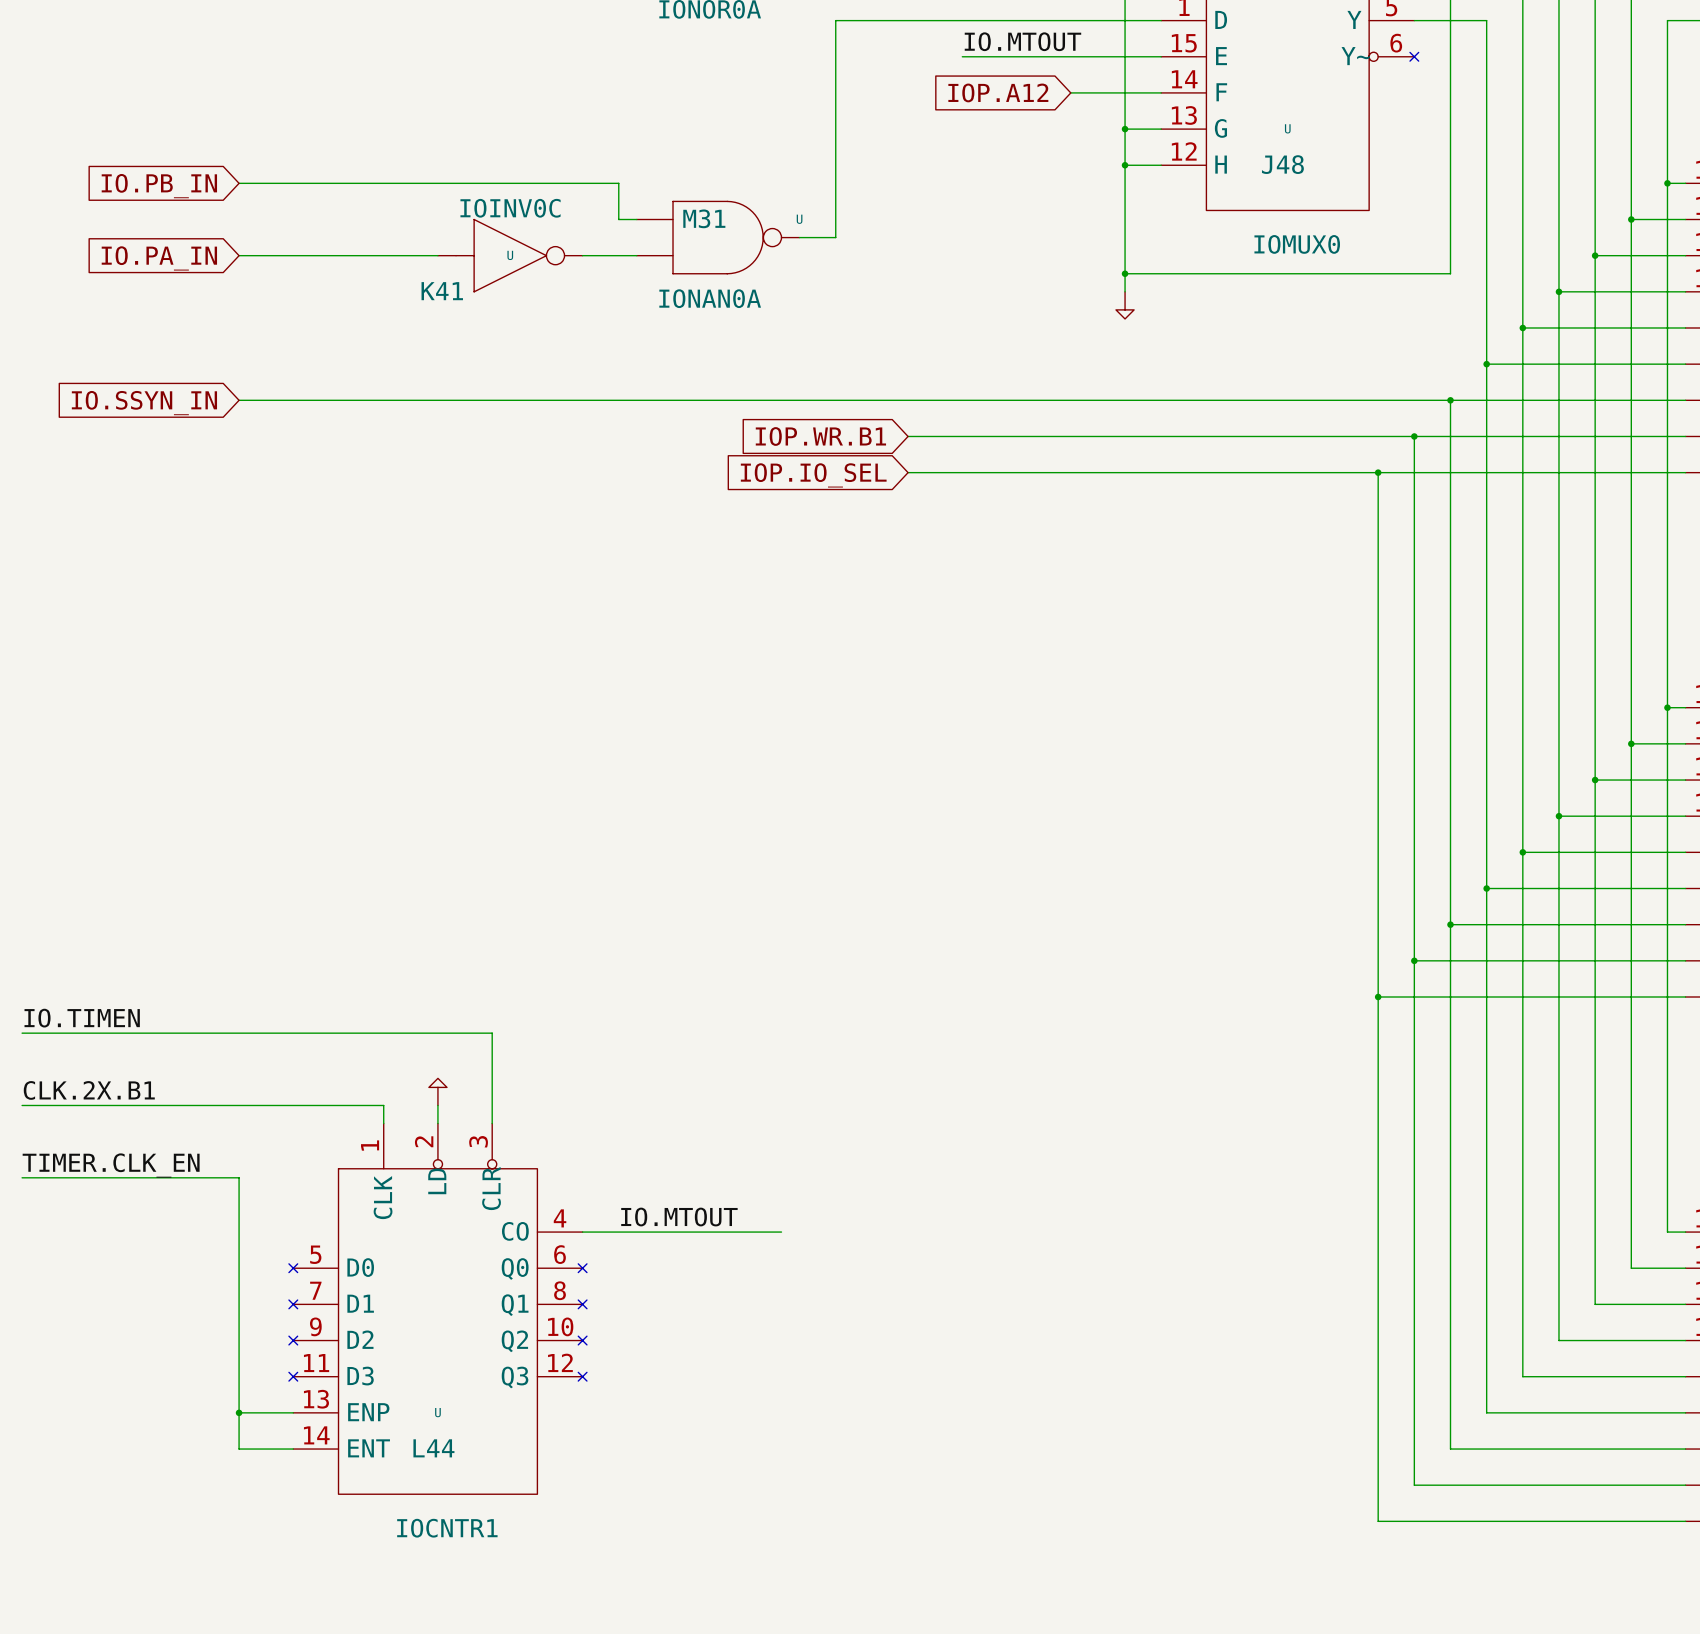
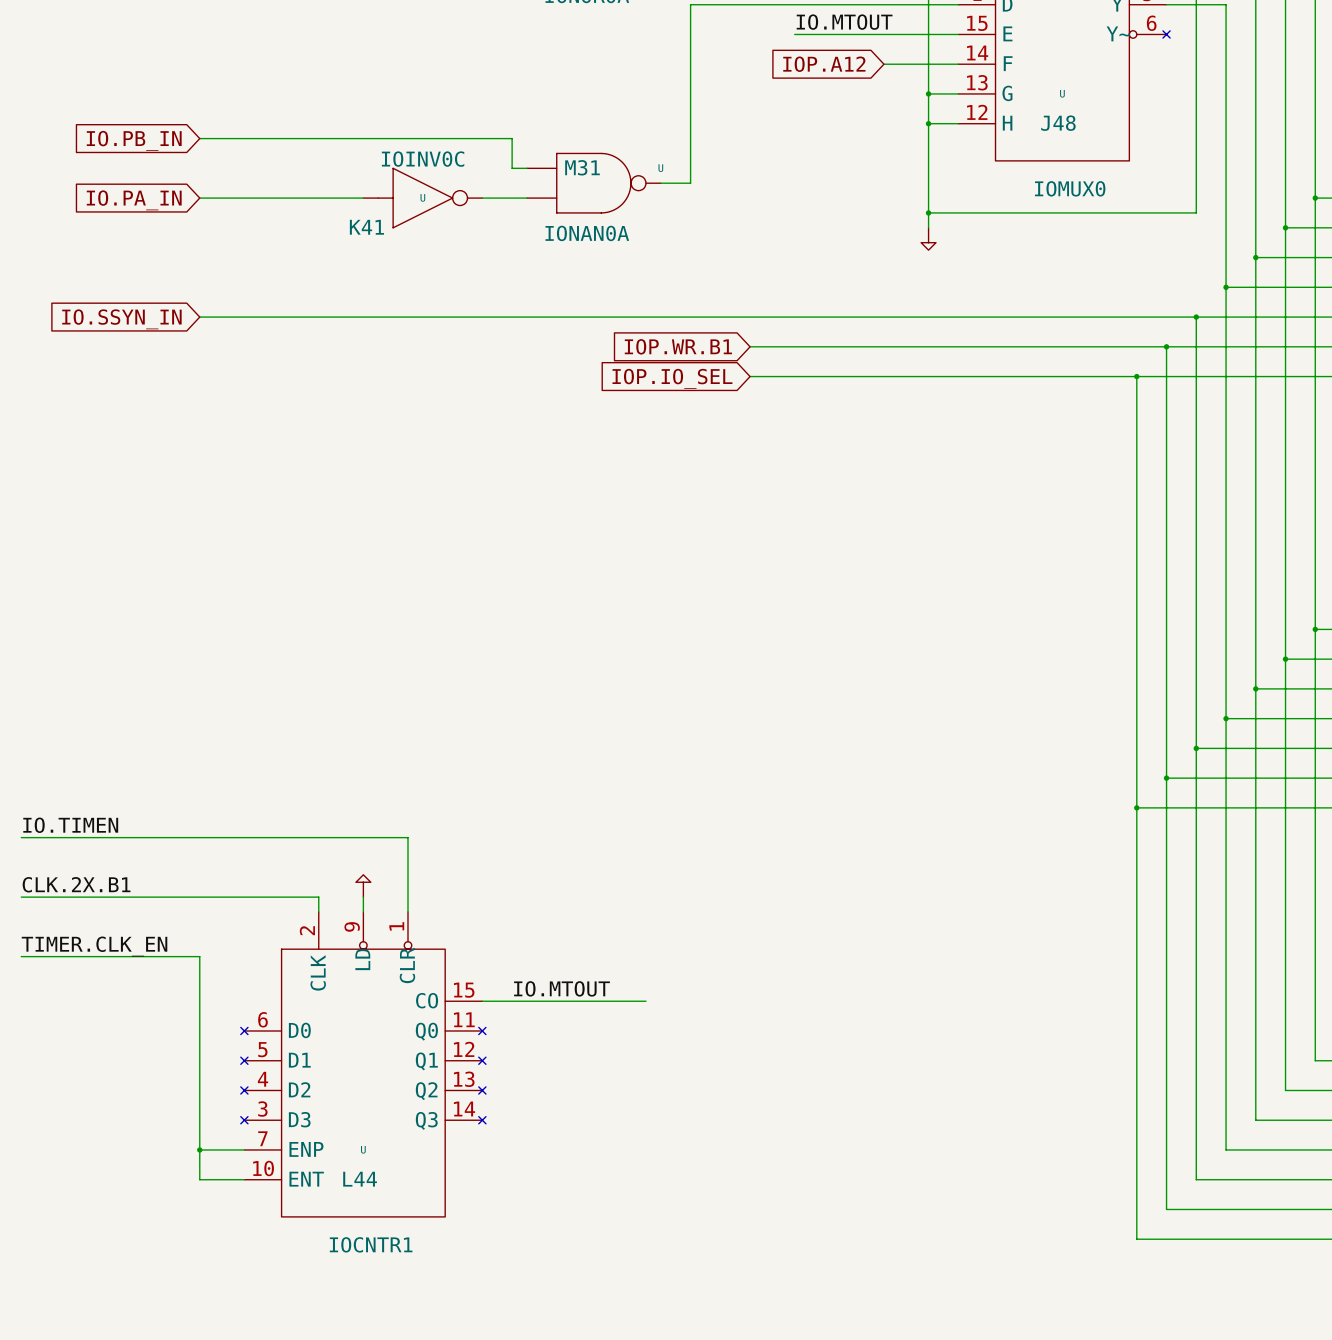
U symbol: [293, 1123, 583, 1495] -> [244, 912, 483, 1217]

